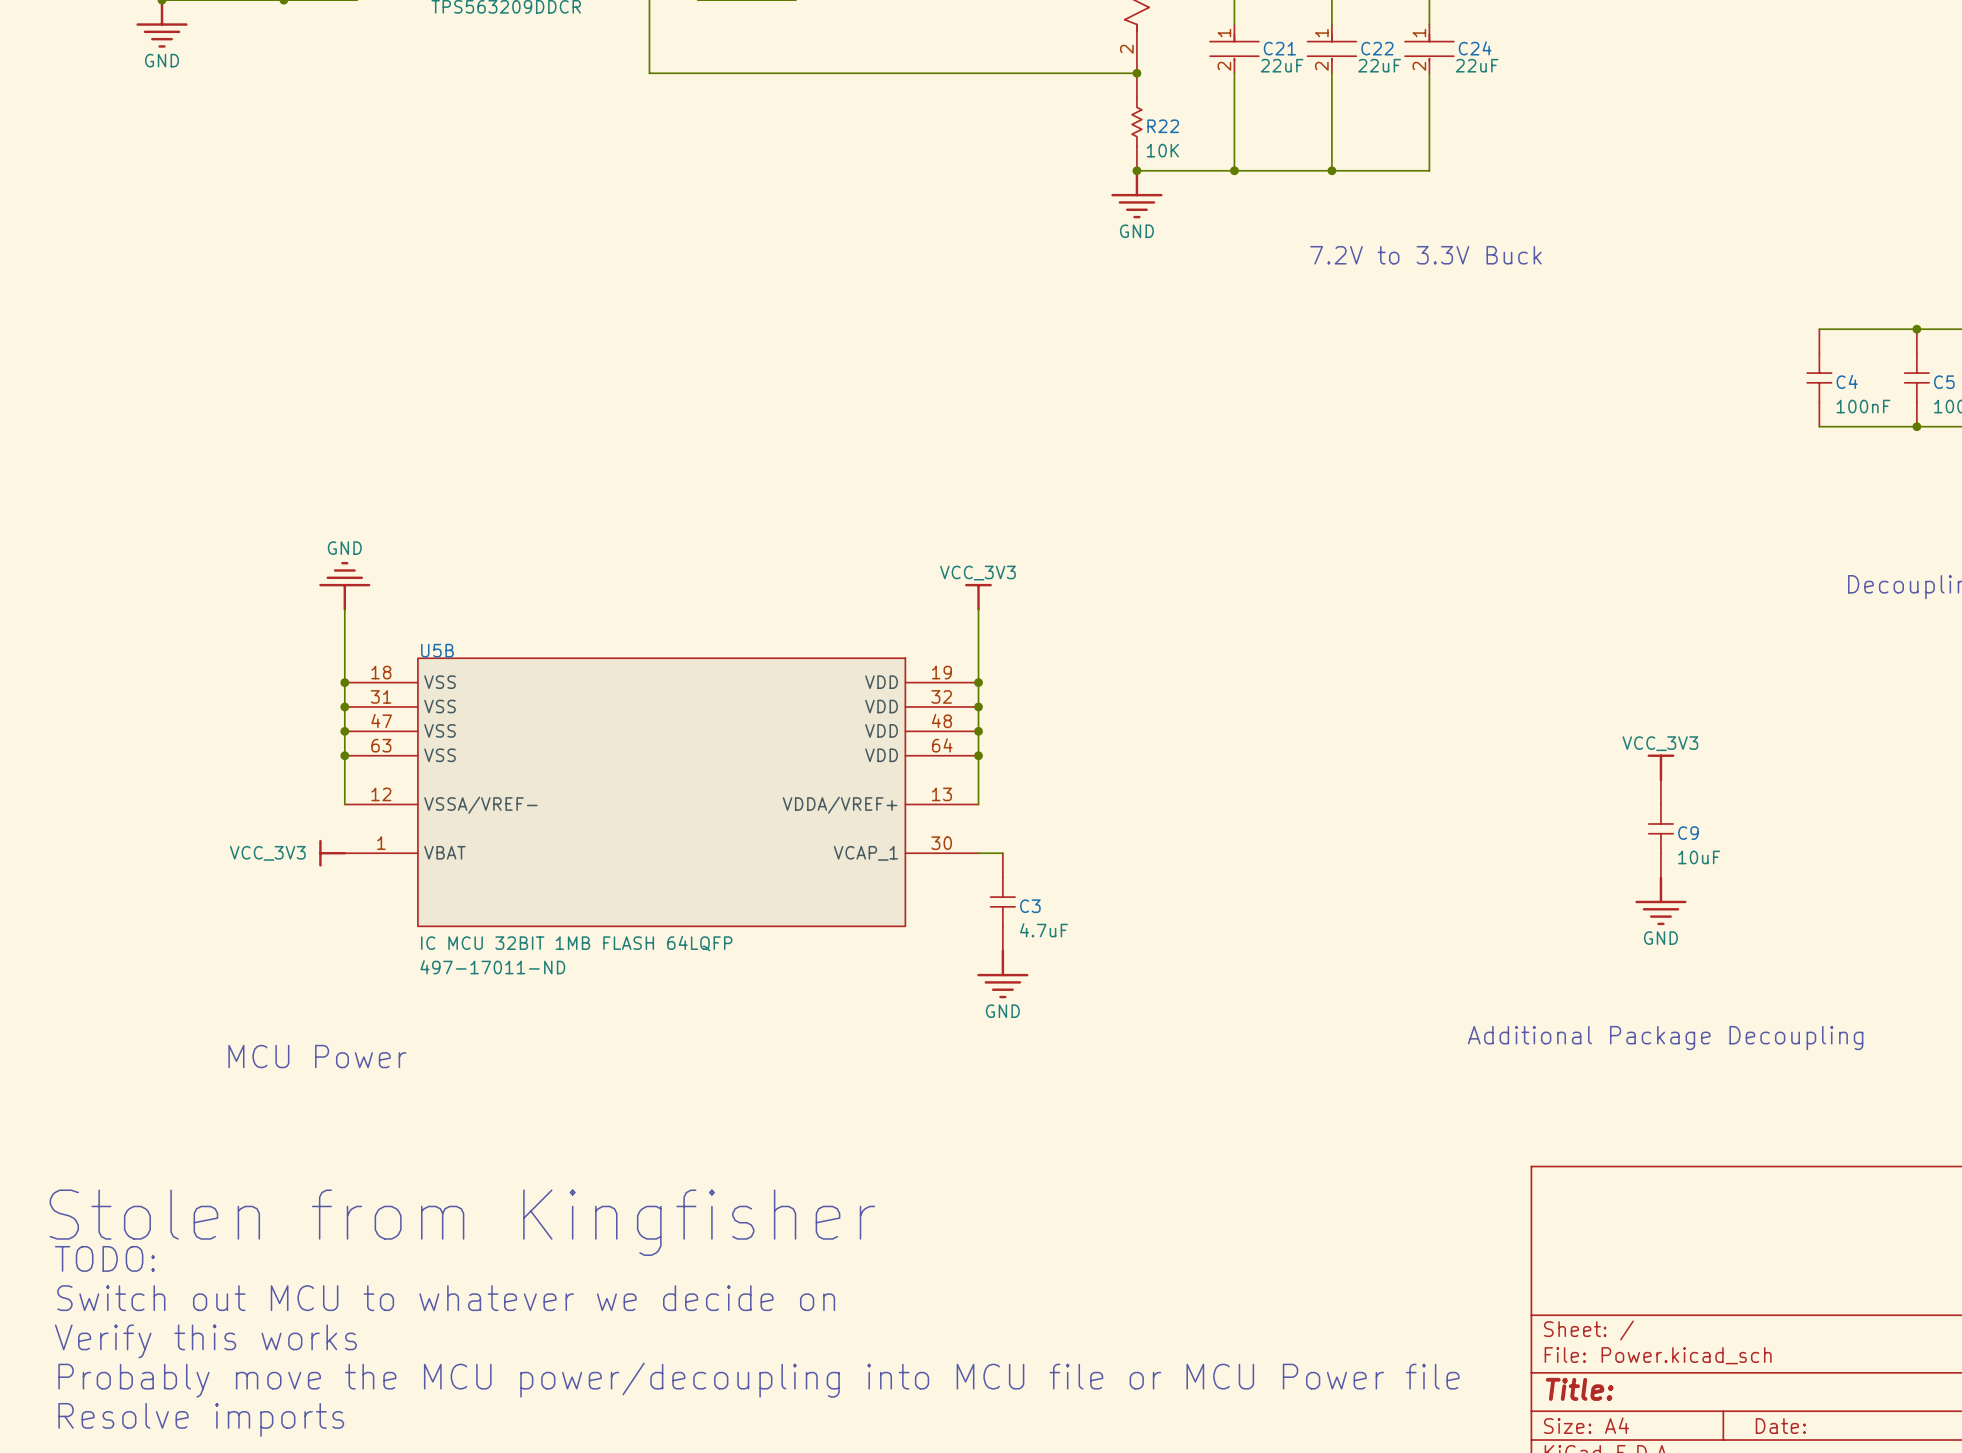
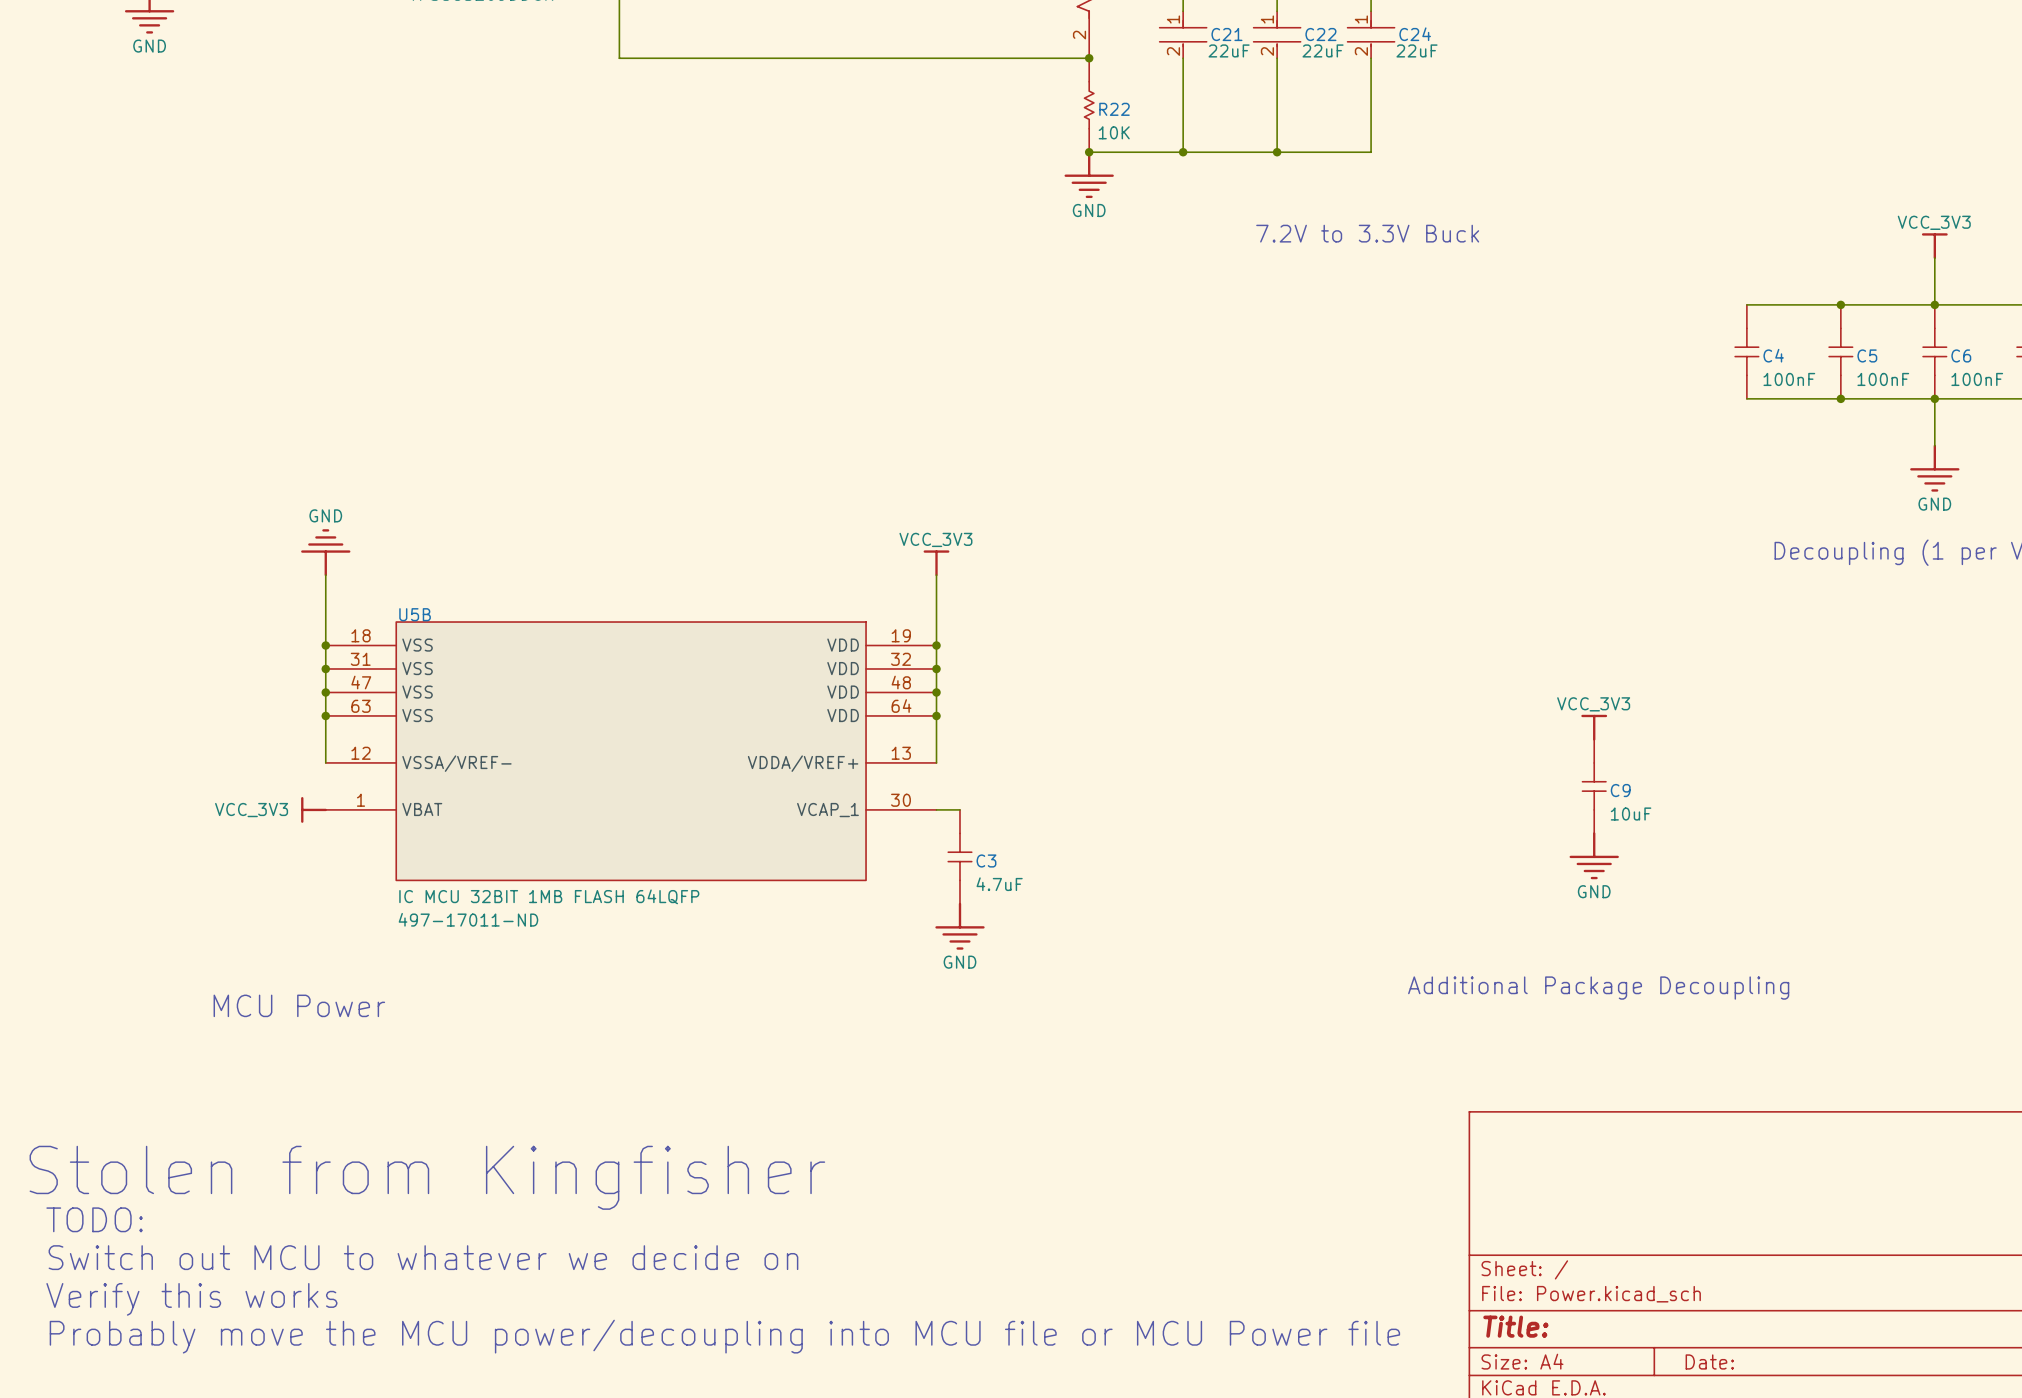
text position: Stolen from Kingfisher (462, 1222) -> Stolen from Kingfisher (427, 1177)
text position: TODO: (104, 1258) -> TODO: (94, 1219)
text position: Switch out MCU to whatever we decide on (446, 1298) -> Switch out MCU to whatever we decide on (423, 1257)
text position: Verify this works (205, 1341) -> Verify this works (191, 1299)
text position: Probably move the MCU power/decoupling into MCU file or MCU Power file (758, 1380) -> Probably move the MCU power/decoupling into MCU file or MCU Power file (724, 1336)
text: Resolve imports (201, 1419) -> none

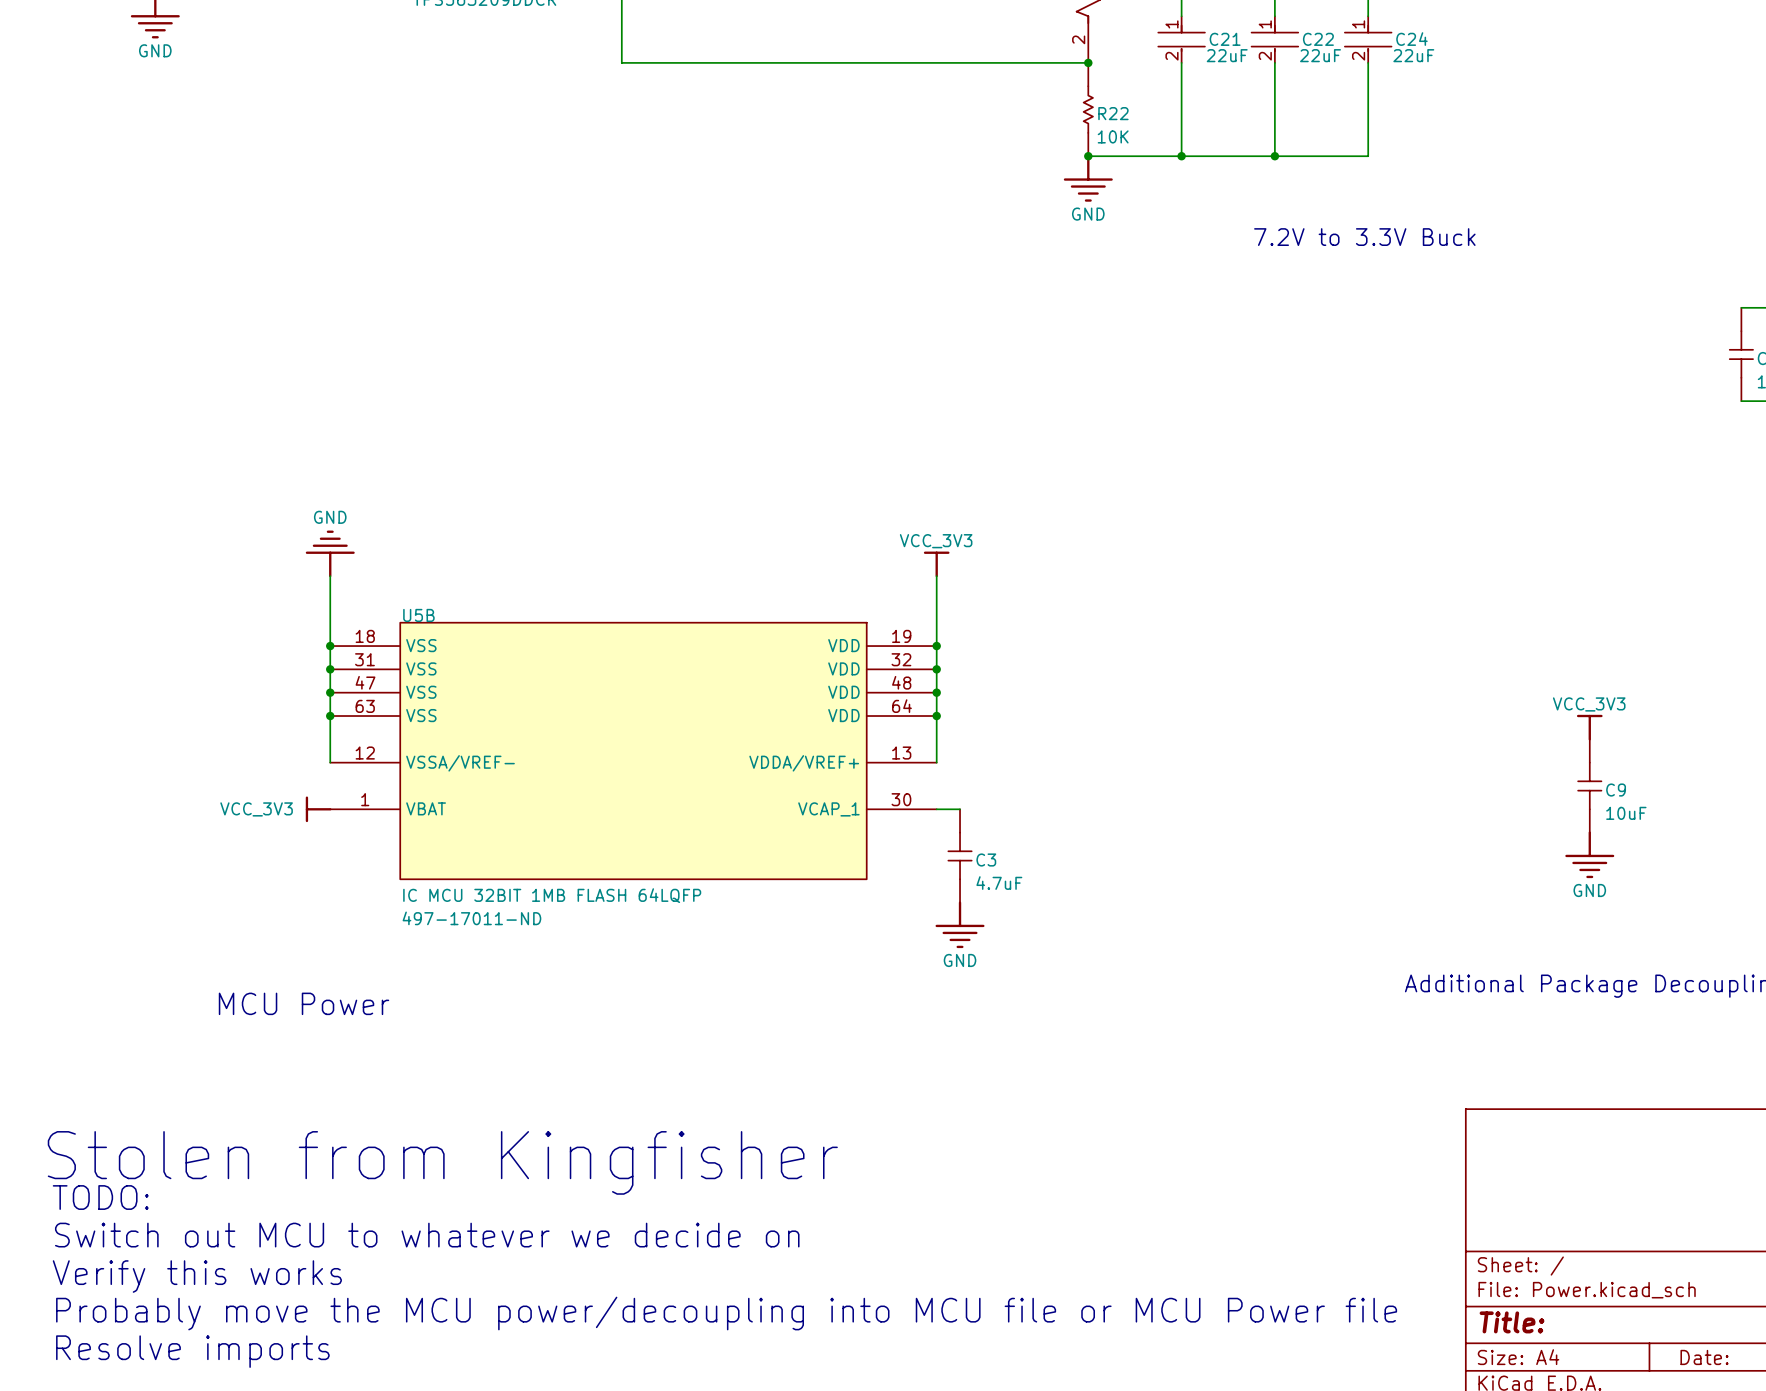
text position: Stolen from Kingfisher (427, 1177) -> Stolen from Kingfisher (442, 1162)
text position: TODO: (94, 1219) -> TODO: (100, 1197)
text position: Switch out MCU to whatever we decide on (423, 1257) -> Switch out MCU to whatever we decide on (427, 1235)
text position: Verify this works (191, 1299) -> Verify this works (197, 1276)
text position: Probably move the MCU power/decoupling into MCU file or MCU Power file (724, 1336) -> Probably move the MCU power/decoupling into MCU file or MCU Power file (726, 1313)
text: none -> Resolve imports (192, 1351)

